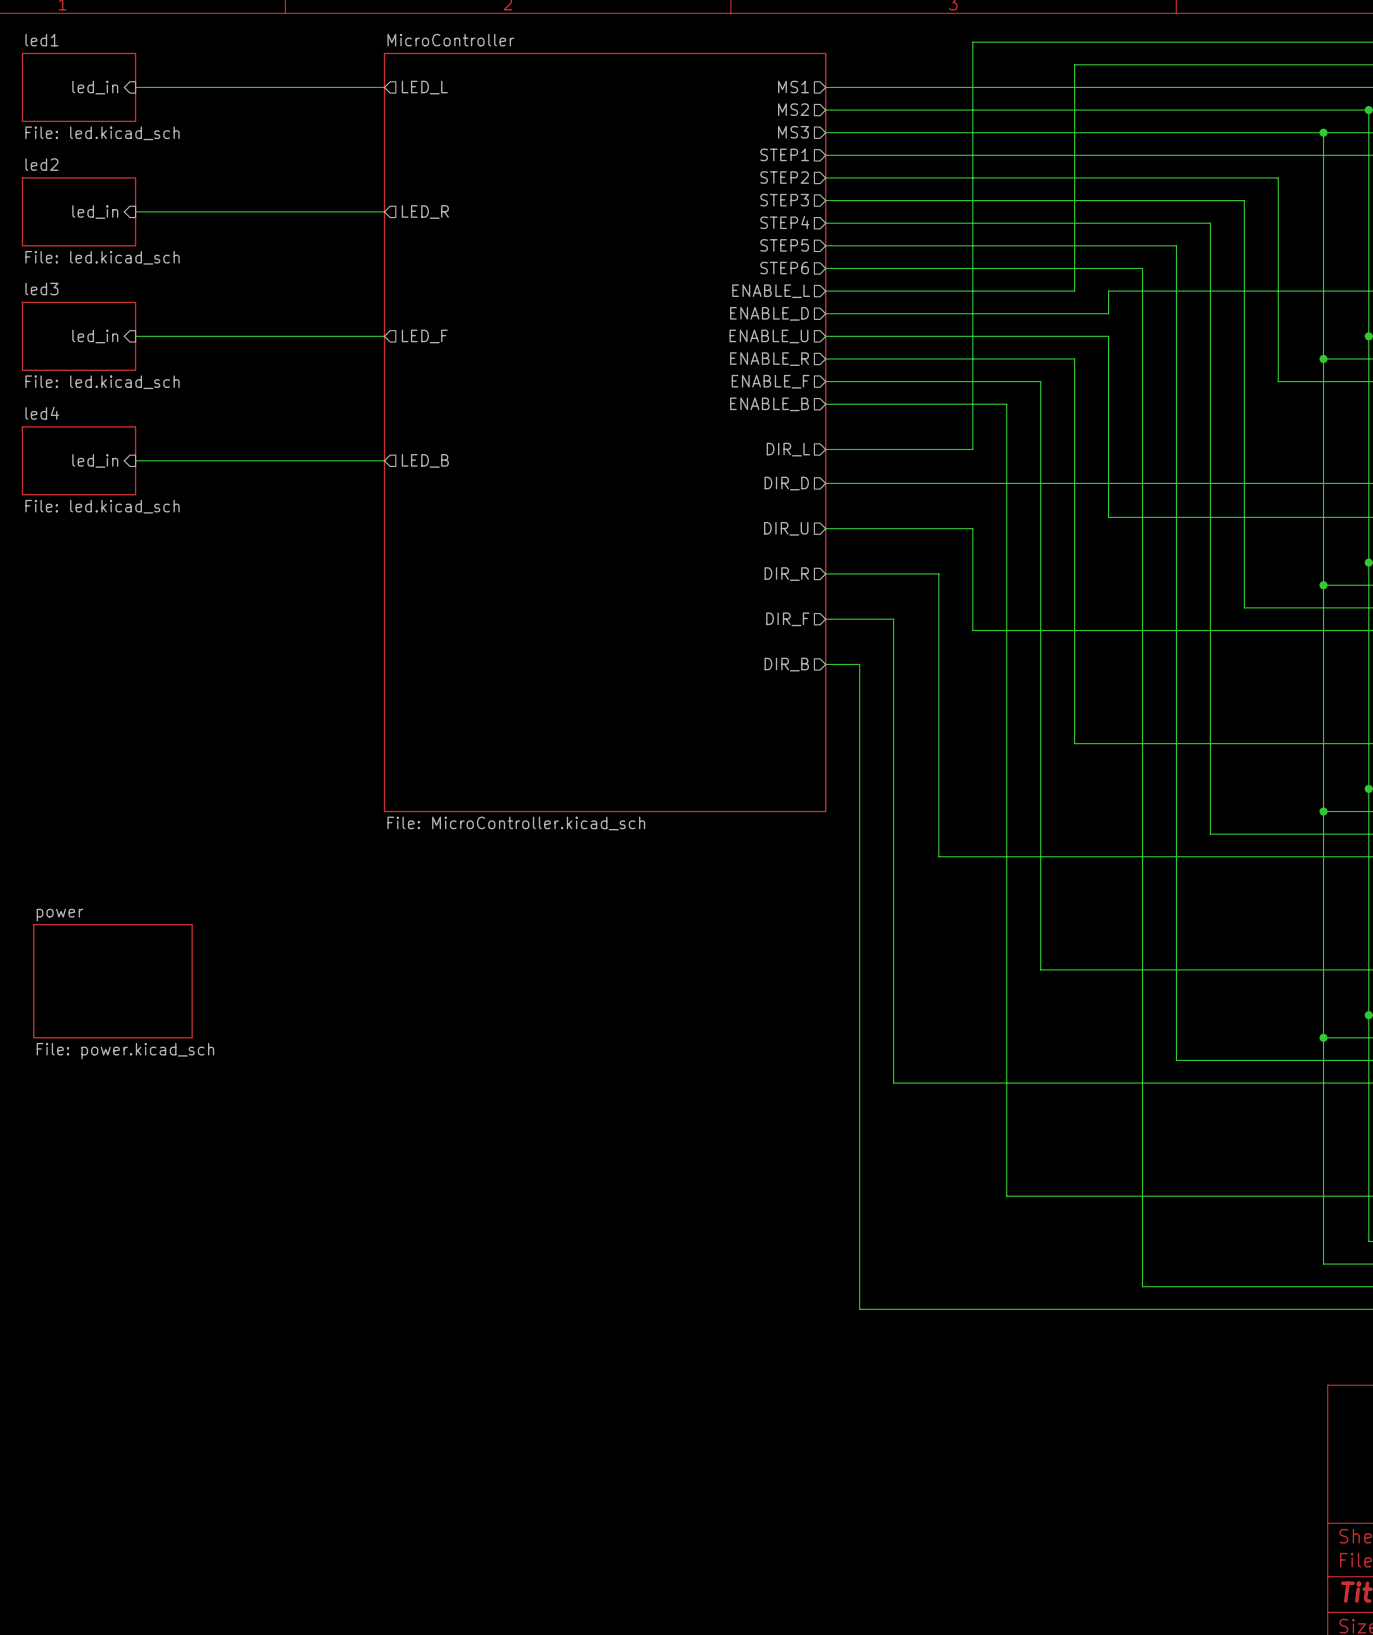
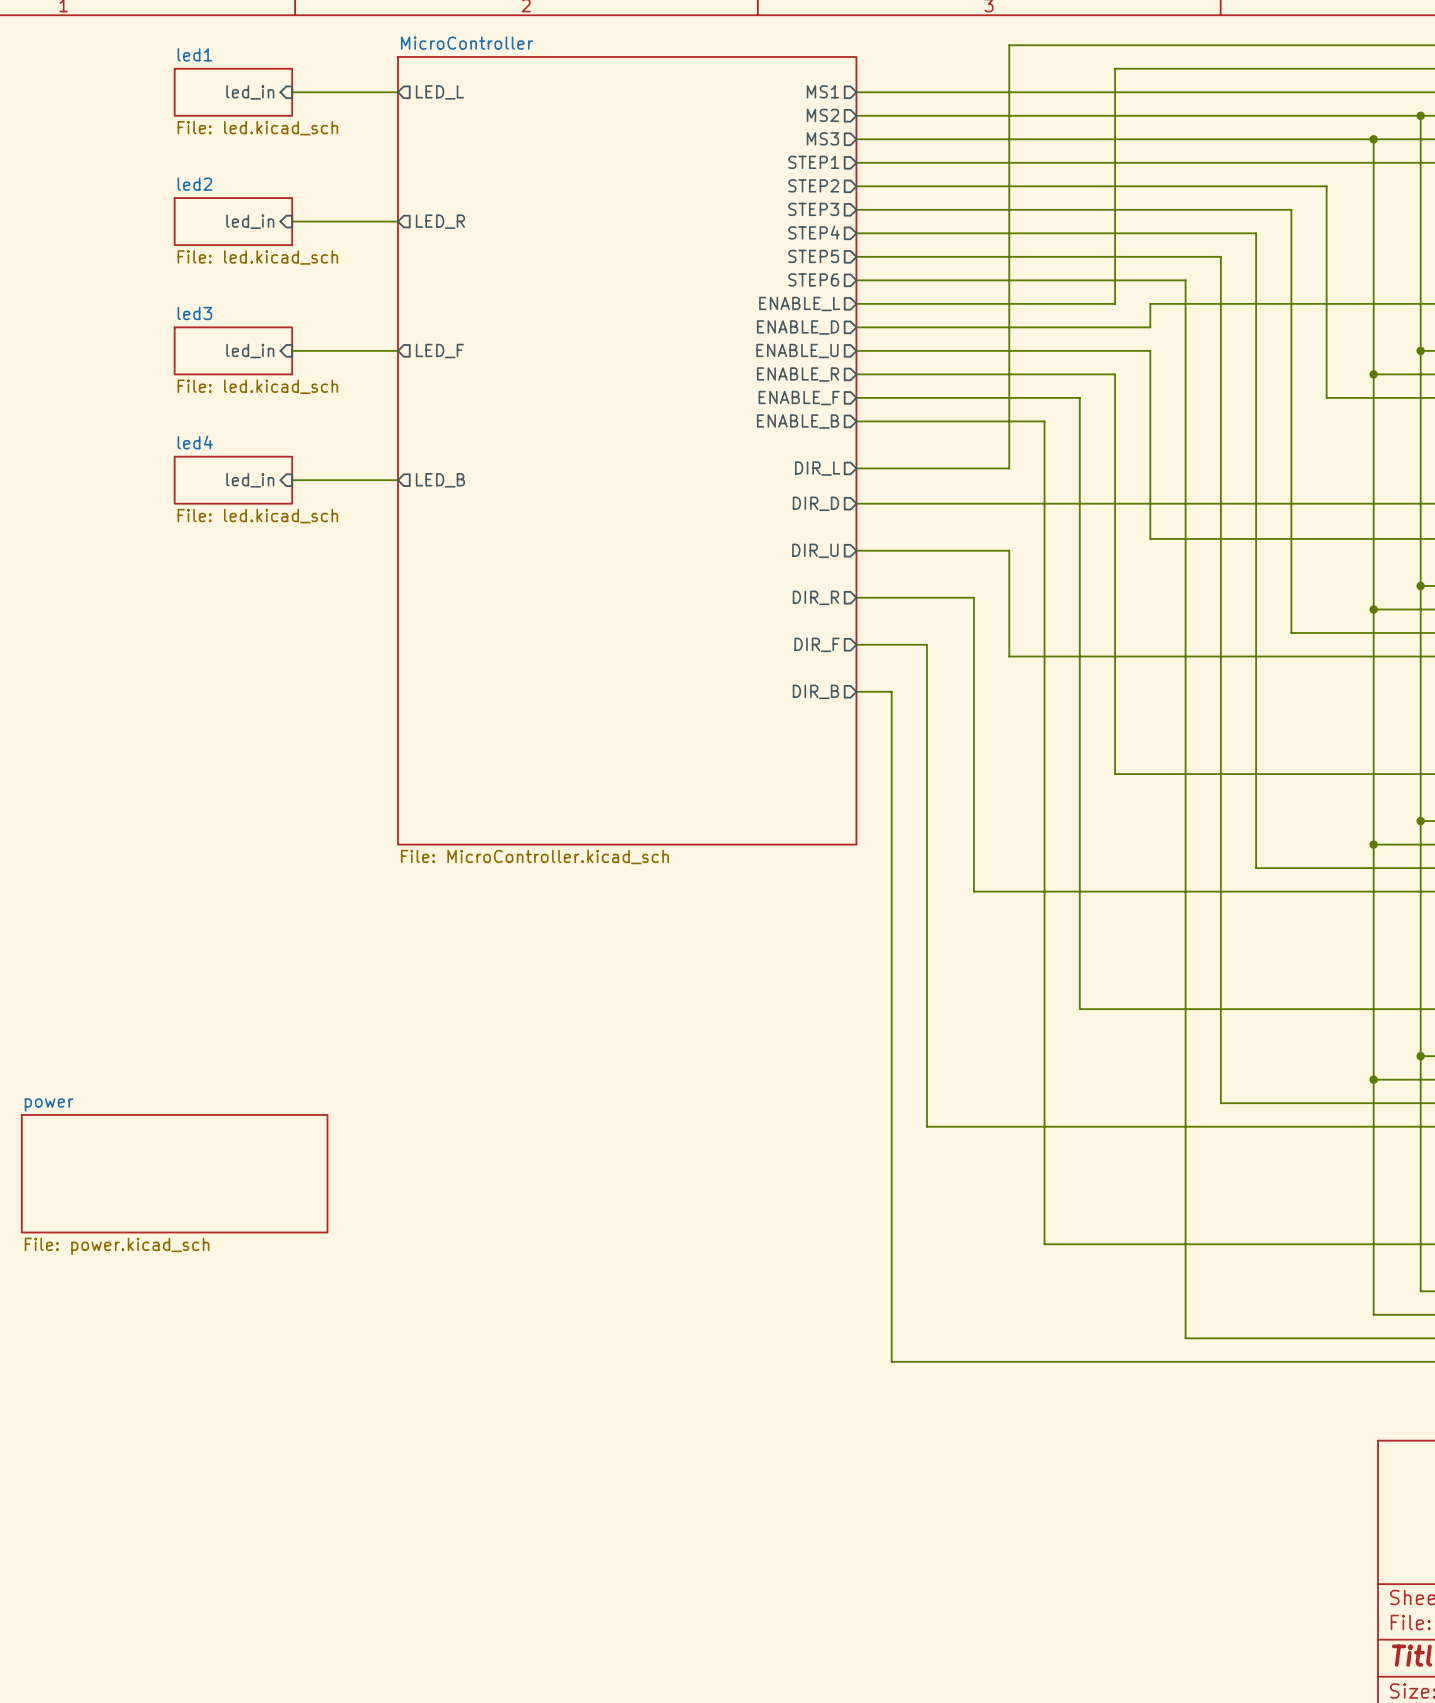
sheet led1 shape: [21, 52, 137, 123] -> [173, 68, 293, 117]
sheet pin: led_in (95, 87) -> none
wire: (135, 87) (282, 87) -> none
sheet pin: none -> led_in (250, 92)
sheet led2 shape: [21, 177, 137, 247] -> [173, 197, 293, 246]
wire: (135, 211) (282, 211) -> none
sheet pin: led_in (95, 212) -> none
sheet pin: none -> led_in (250, 221)
sheet led3 shape: [21, 301, 137, 371] -> [173, 326, 293, 376]
sheet pin: led_in (95, 336) -> none
wire: (135, 336) (282, 336) -> none
sheet pin: none -> led_in (250, 351)
sheet led4 shape: [21, 426, 137, 496] -> [173, 455, 293, 505]
sheet pin: led_in (95, 460) -> none
wire: (135, 460) (282, 460) -> none
sheet pin: none -> led_in (250, 480)
sheet power: File: power.kicad_sch (112, 981) -> none
sheet power: none -> File: power.kicad_sch (174, 1173)

